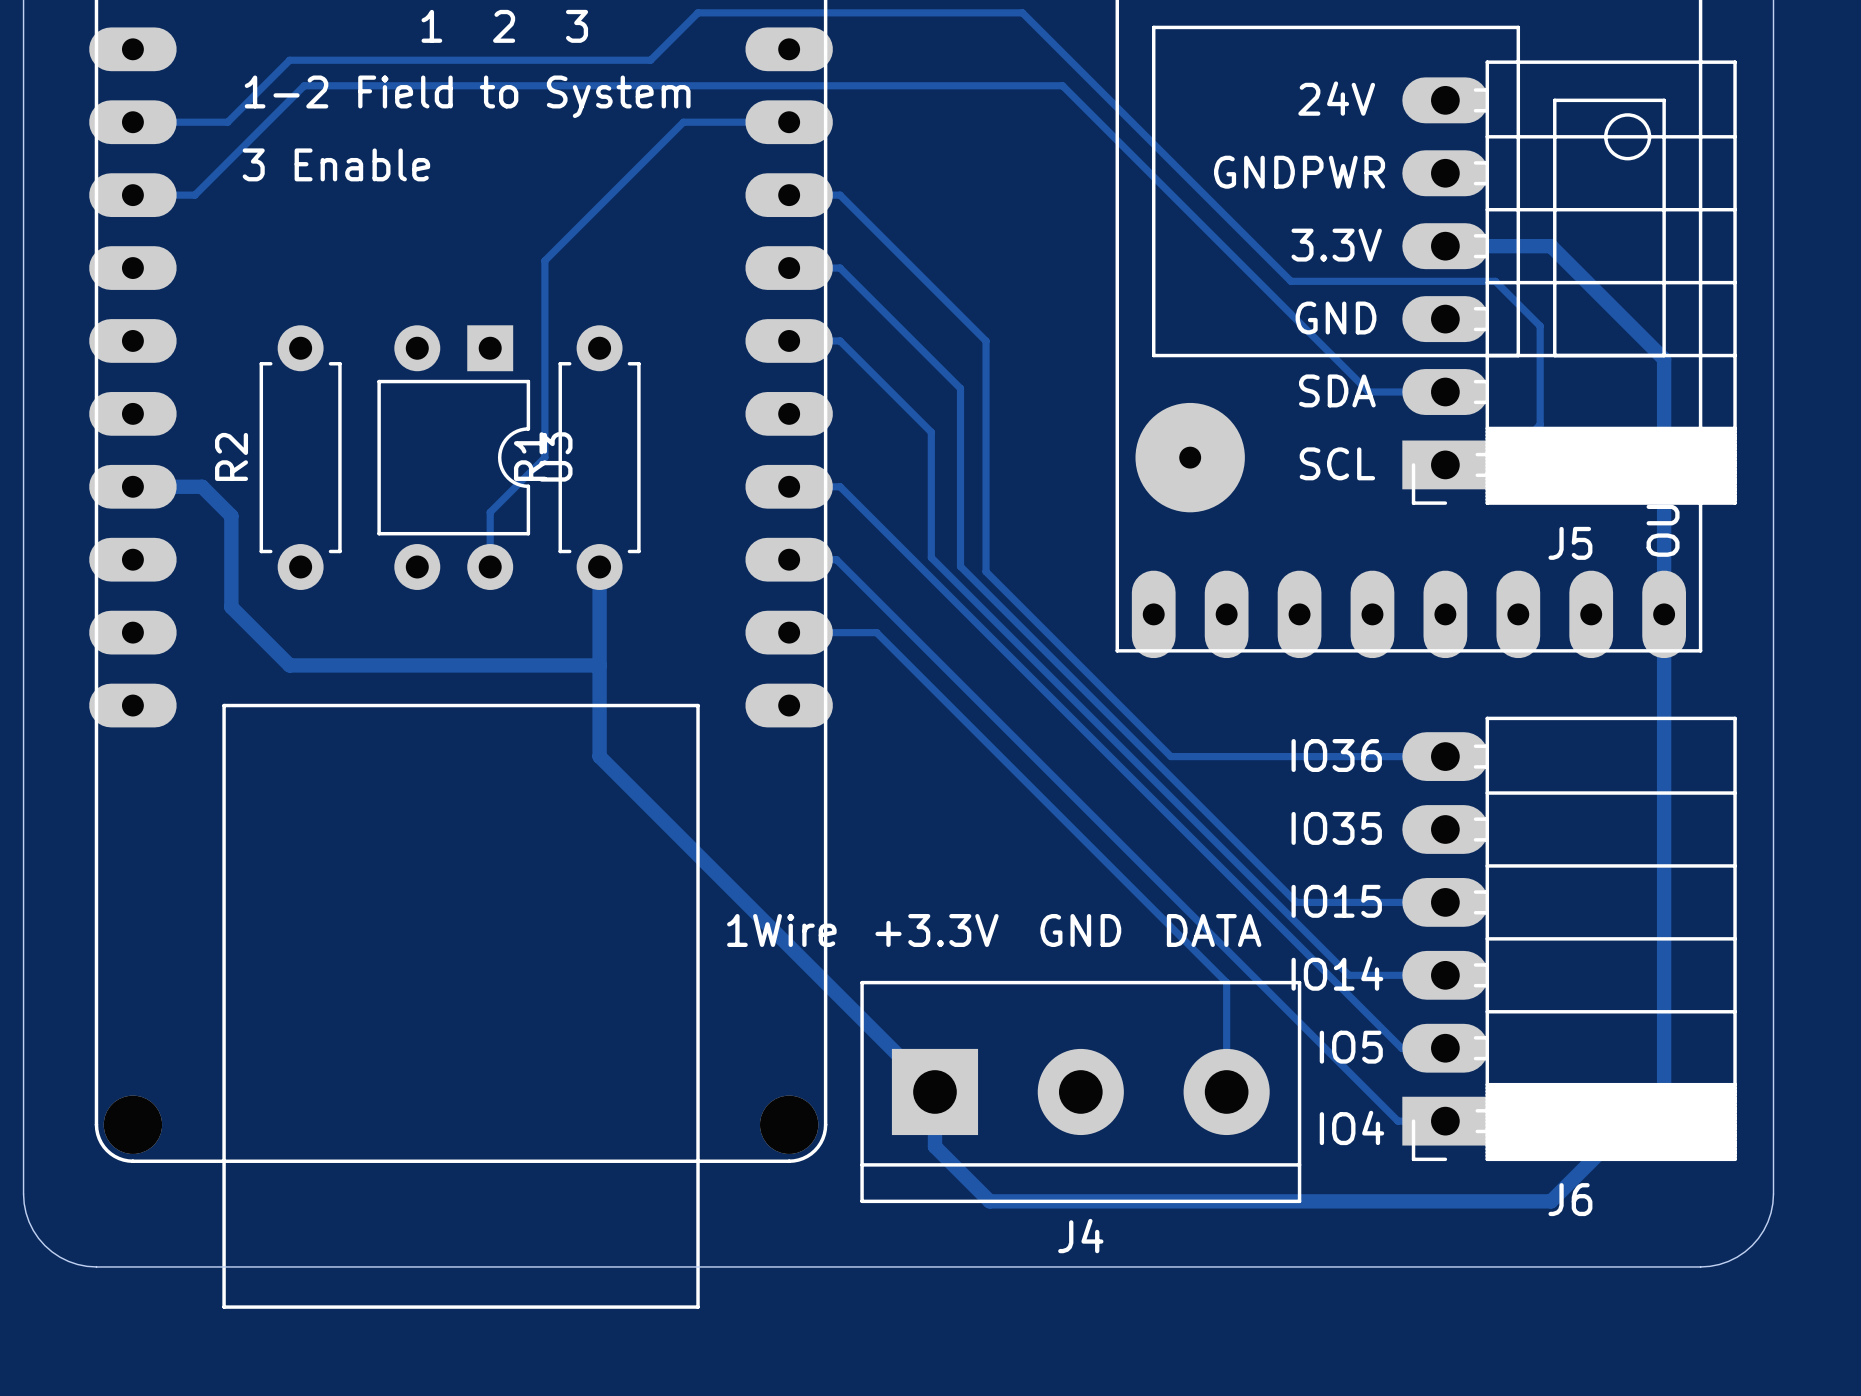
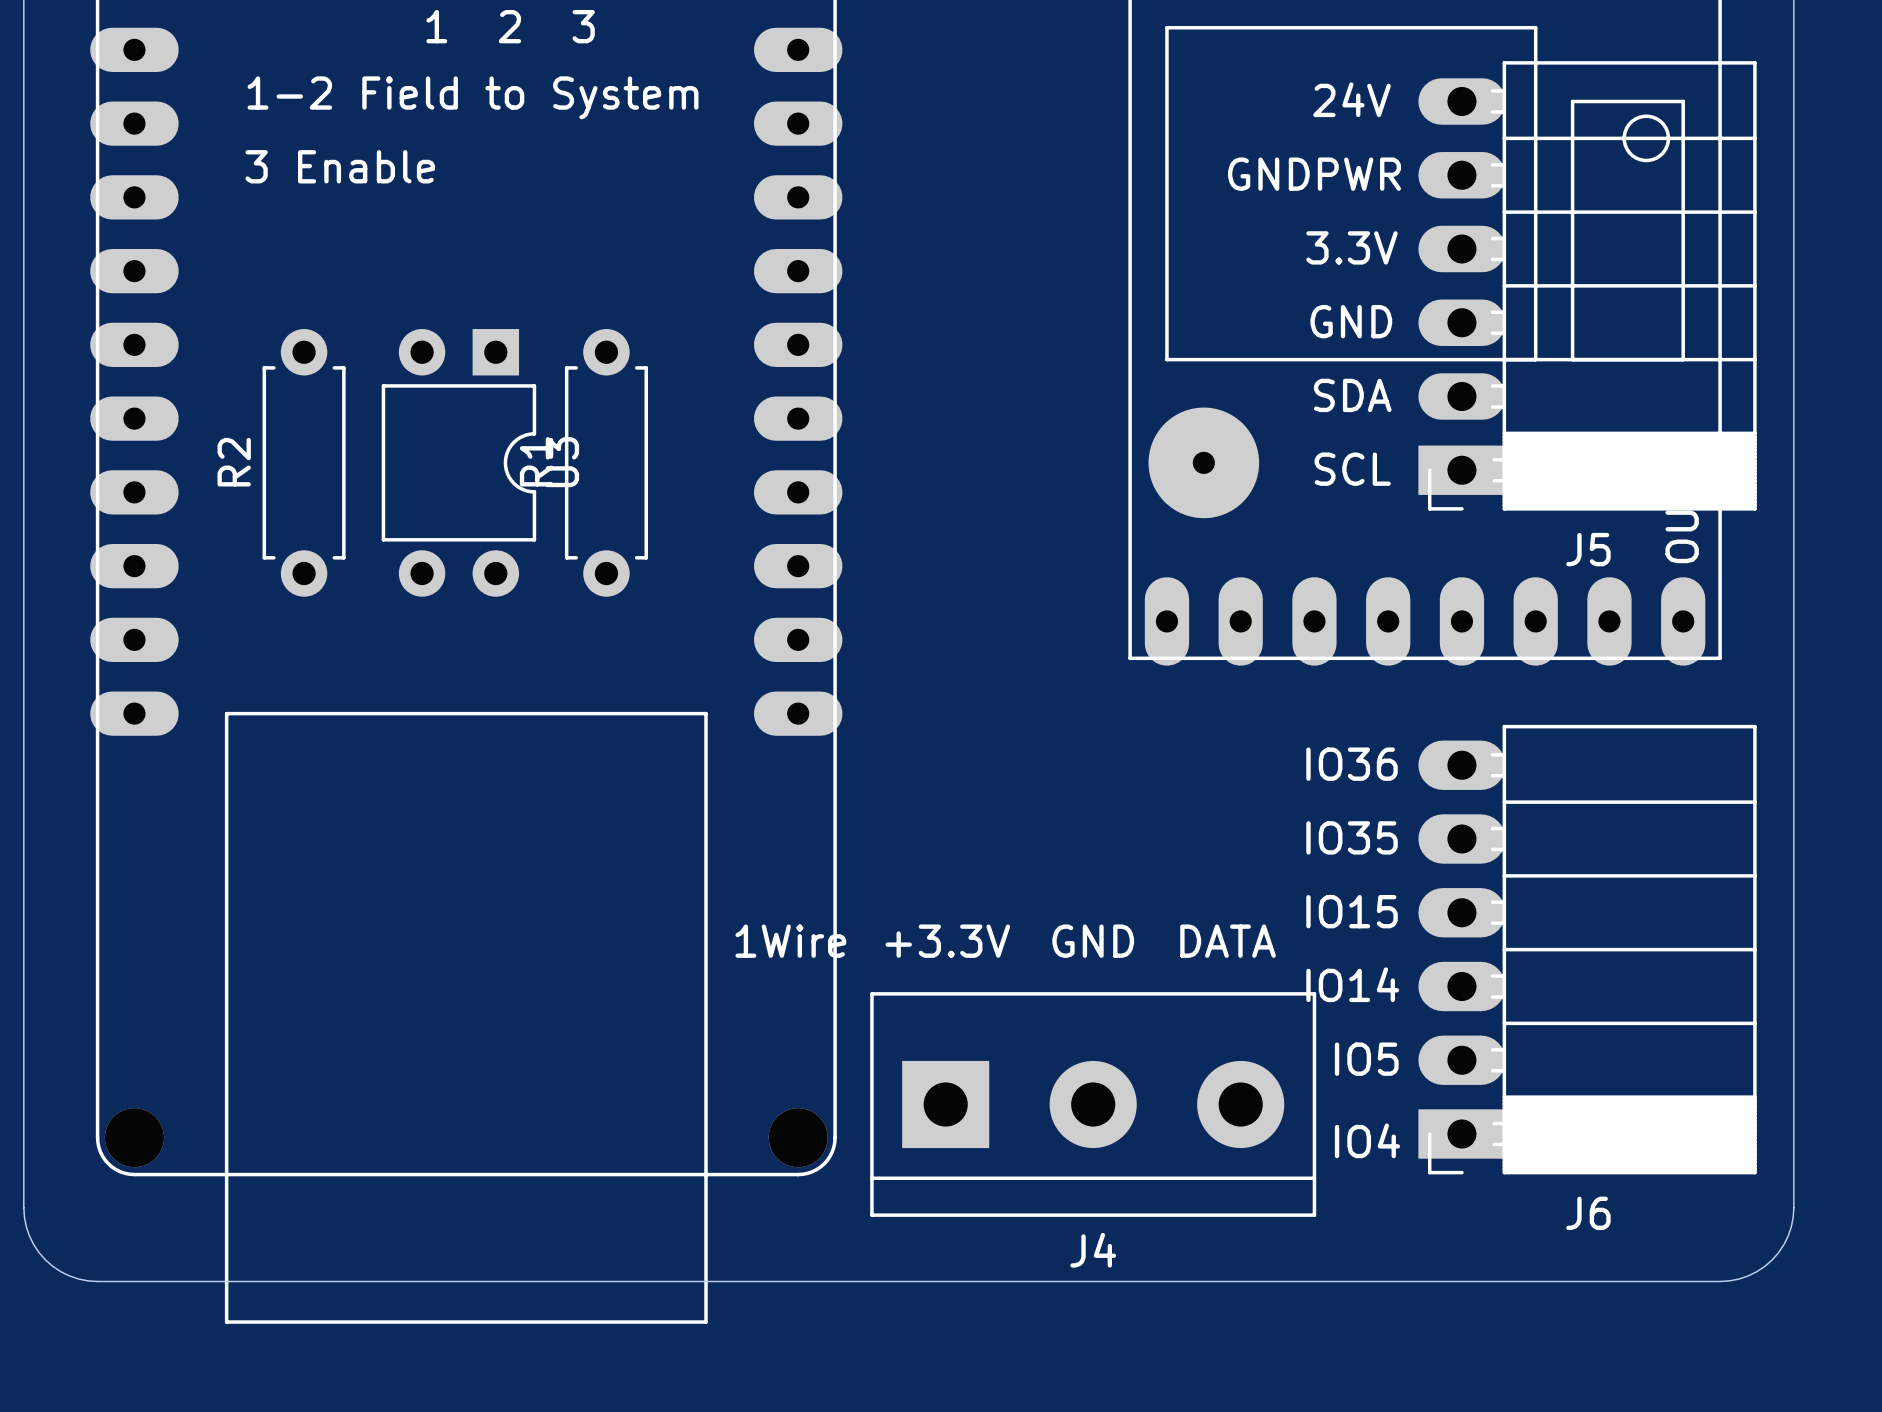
track: (132, 122) (227, 122) (289, 60) (650, 60) (698, 12) (1022, 12) (1290, 281) (1495, 281) (1540, 326) (1540, 424) (1500, 464) (1445, 464) -> none
track: (789, 122) (683, 122) (544, 260) (544, 457) (490, 512) (490, 567) -> none
track: (132, 195) (194, 195) (304, 85) (1062, 85) (1368, 392) (1445, 392) -> none
track: (789, 195) (840, 195) (986, 341) (986, 571) (1170, 756) (1445, 756) -> none
track: (1445, 246) (1551, 246) (1664, 359) (1664, 1088) (1551, 1201) (989, 1201) (934, 1146) (934, 1091) (599, 756) (599, 567) -> none
track: (789, 268) (840, 268) (960, 388) (960, 566) (1296, 902) (1445, 902) -> none
track: (789, 340) (840, 340) (931, 432) (931, 557) (1349, 975) (1445, 975) -> none
track: (132, 486) (202, 486) (231, 515) (231, 607) (289, 665) (599, 665) -> none
track: (789, 486) (840, 486) (1401, 1048) (1445, 1048) -> none
track: (789, 559) (836, 559) (1397, 1121) (1445, 1121) -> none
track: (789, 632) (876, 632) (1226, 982) (1226, 1091) -> none

